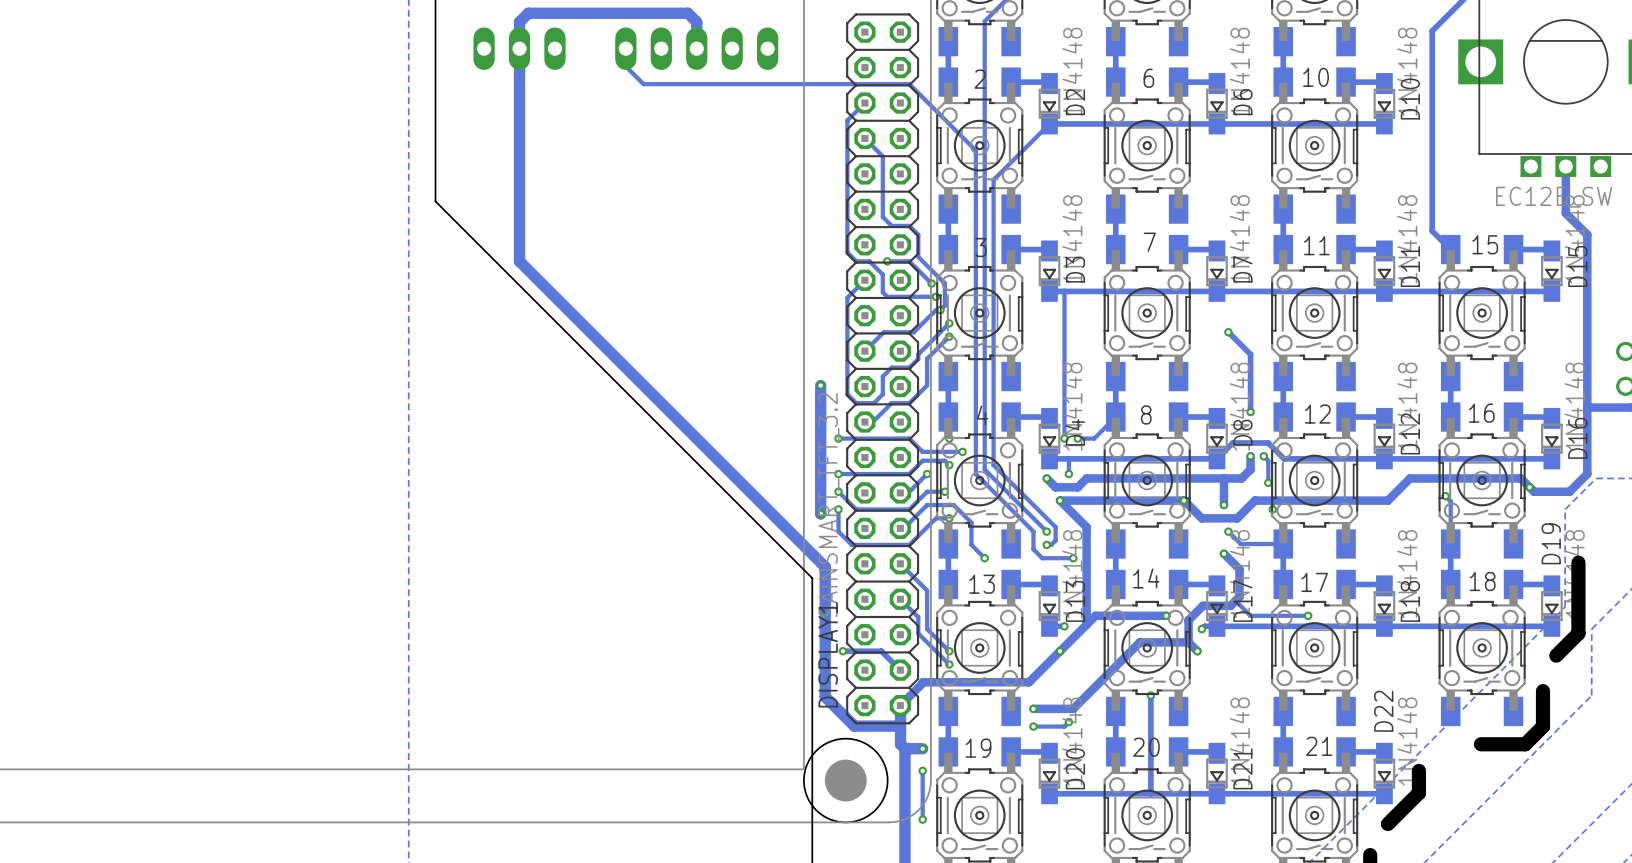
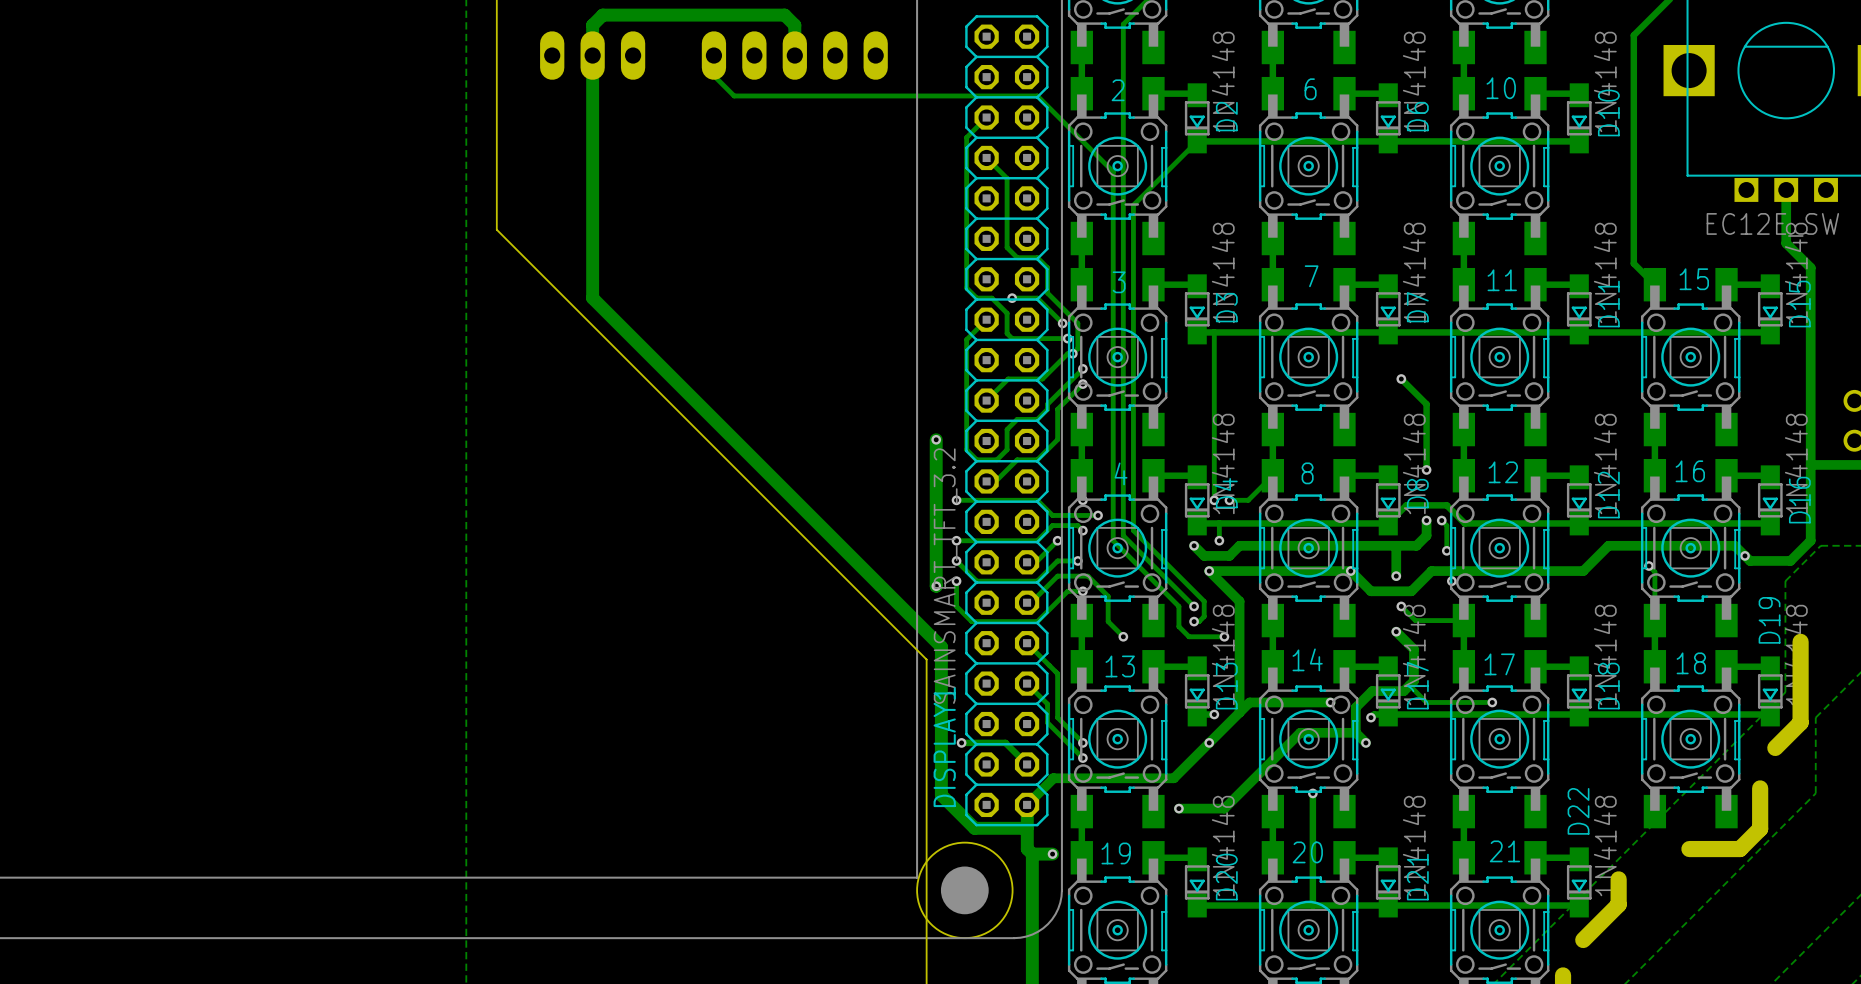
track: (1068, 722) (1064, 726) (1033, 726) -> none
via: (1068, 722) -> none
via: (1033, 726) -> none
track: (922, 770) (922, 819) -> none
via: (922, 770) -> none
via: (922, 819) -> none

